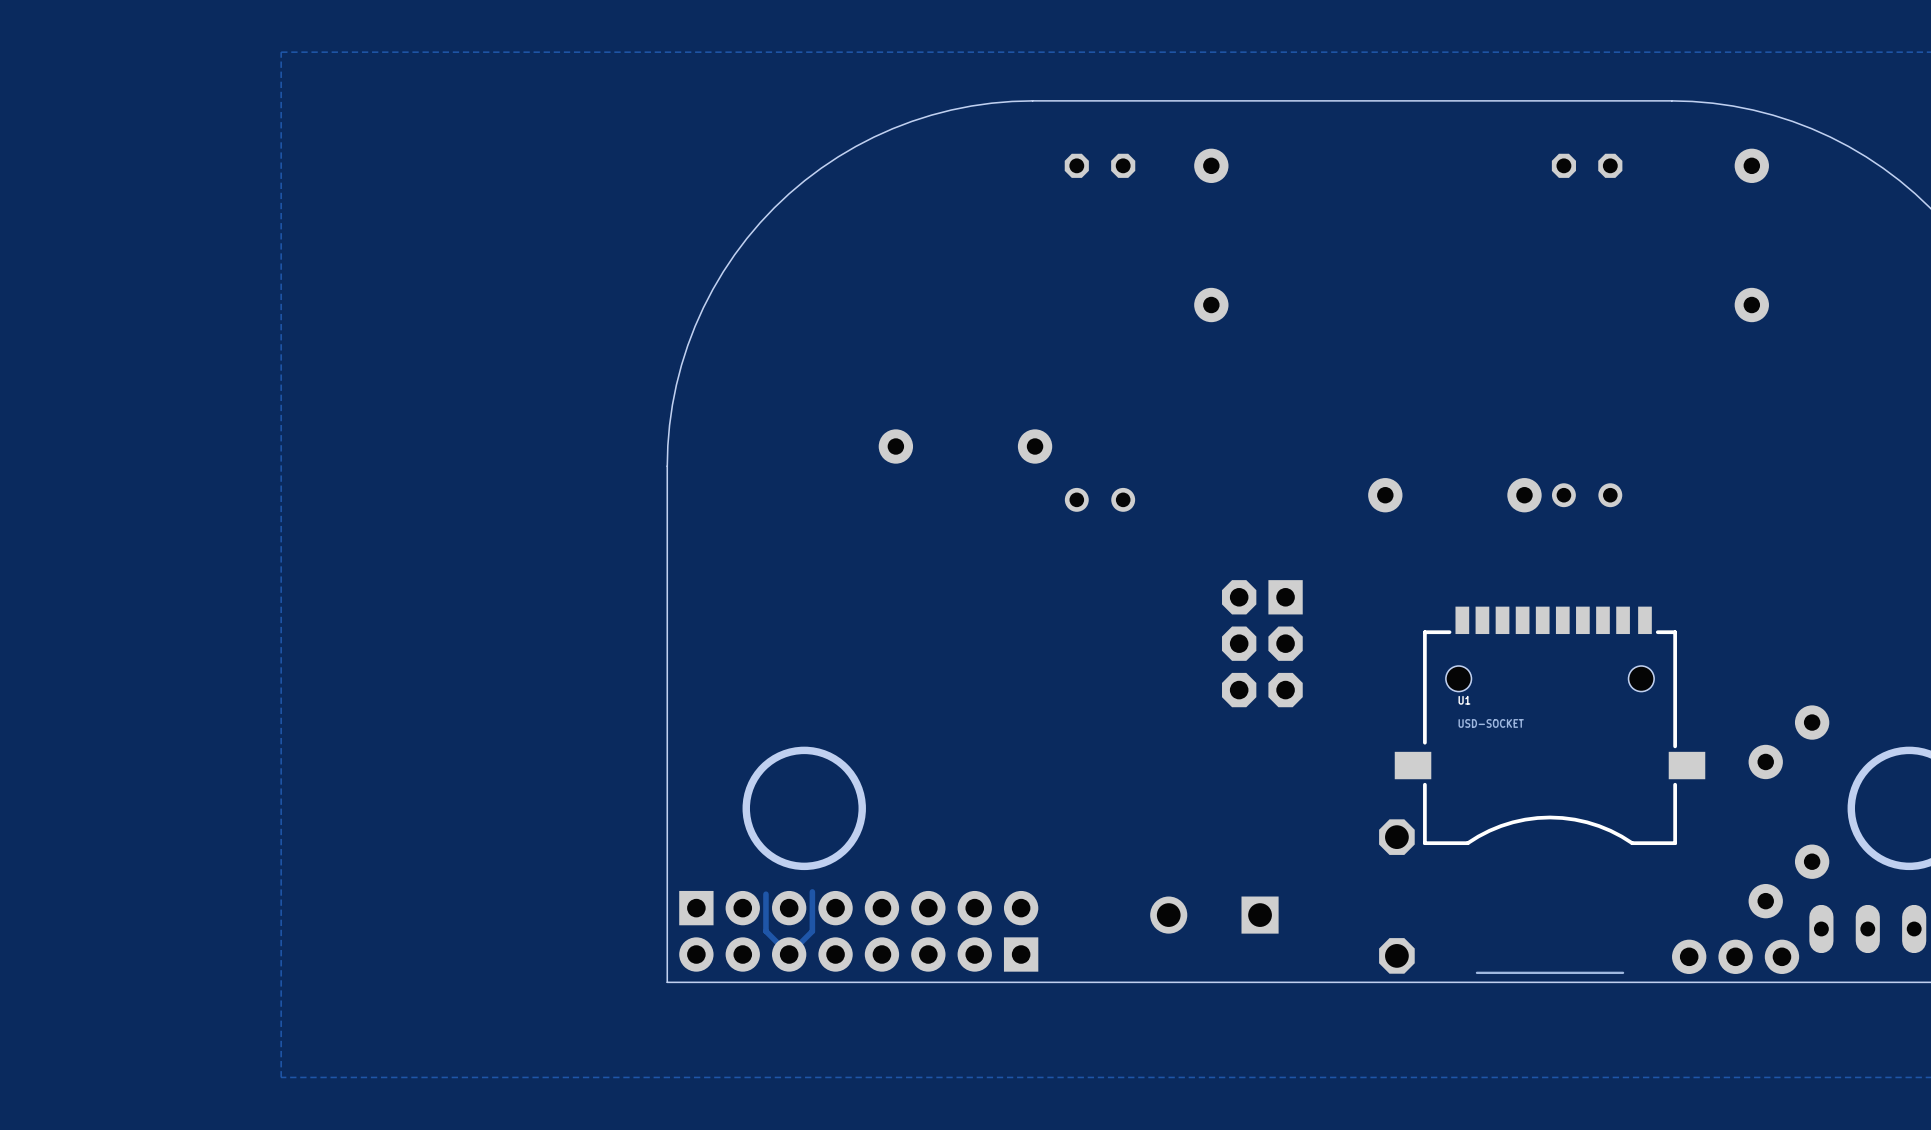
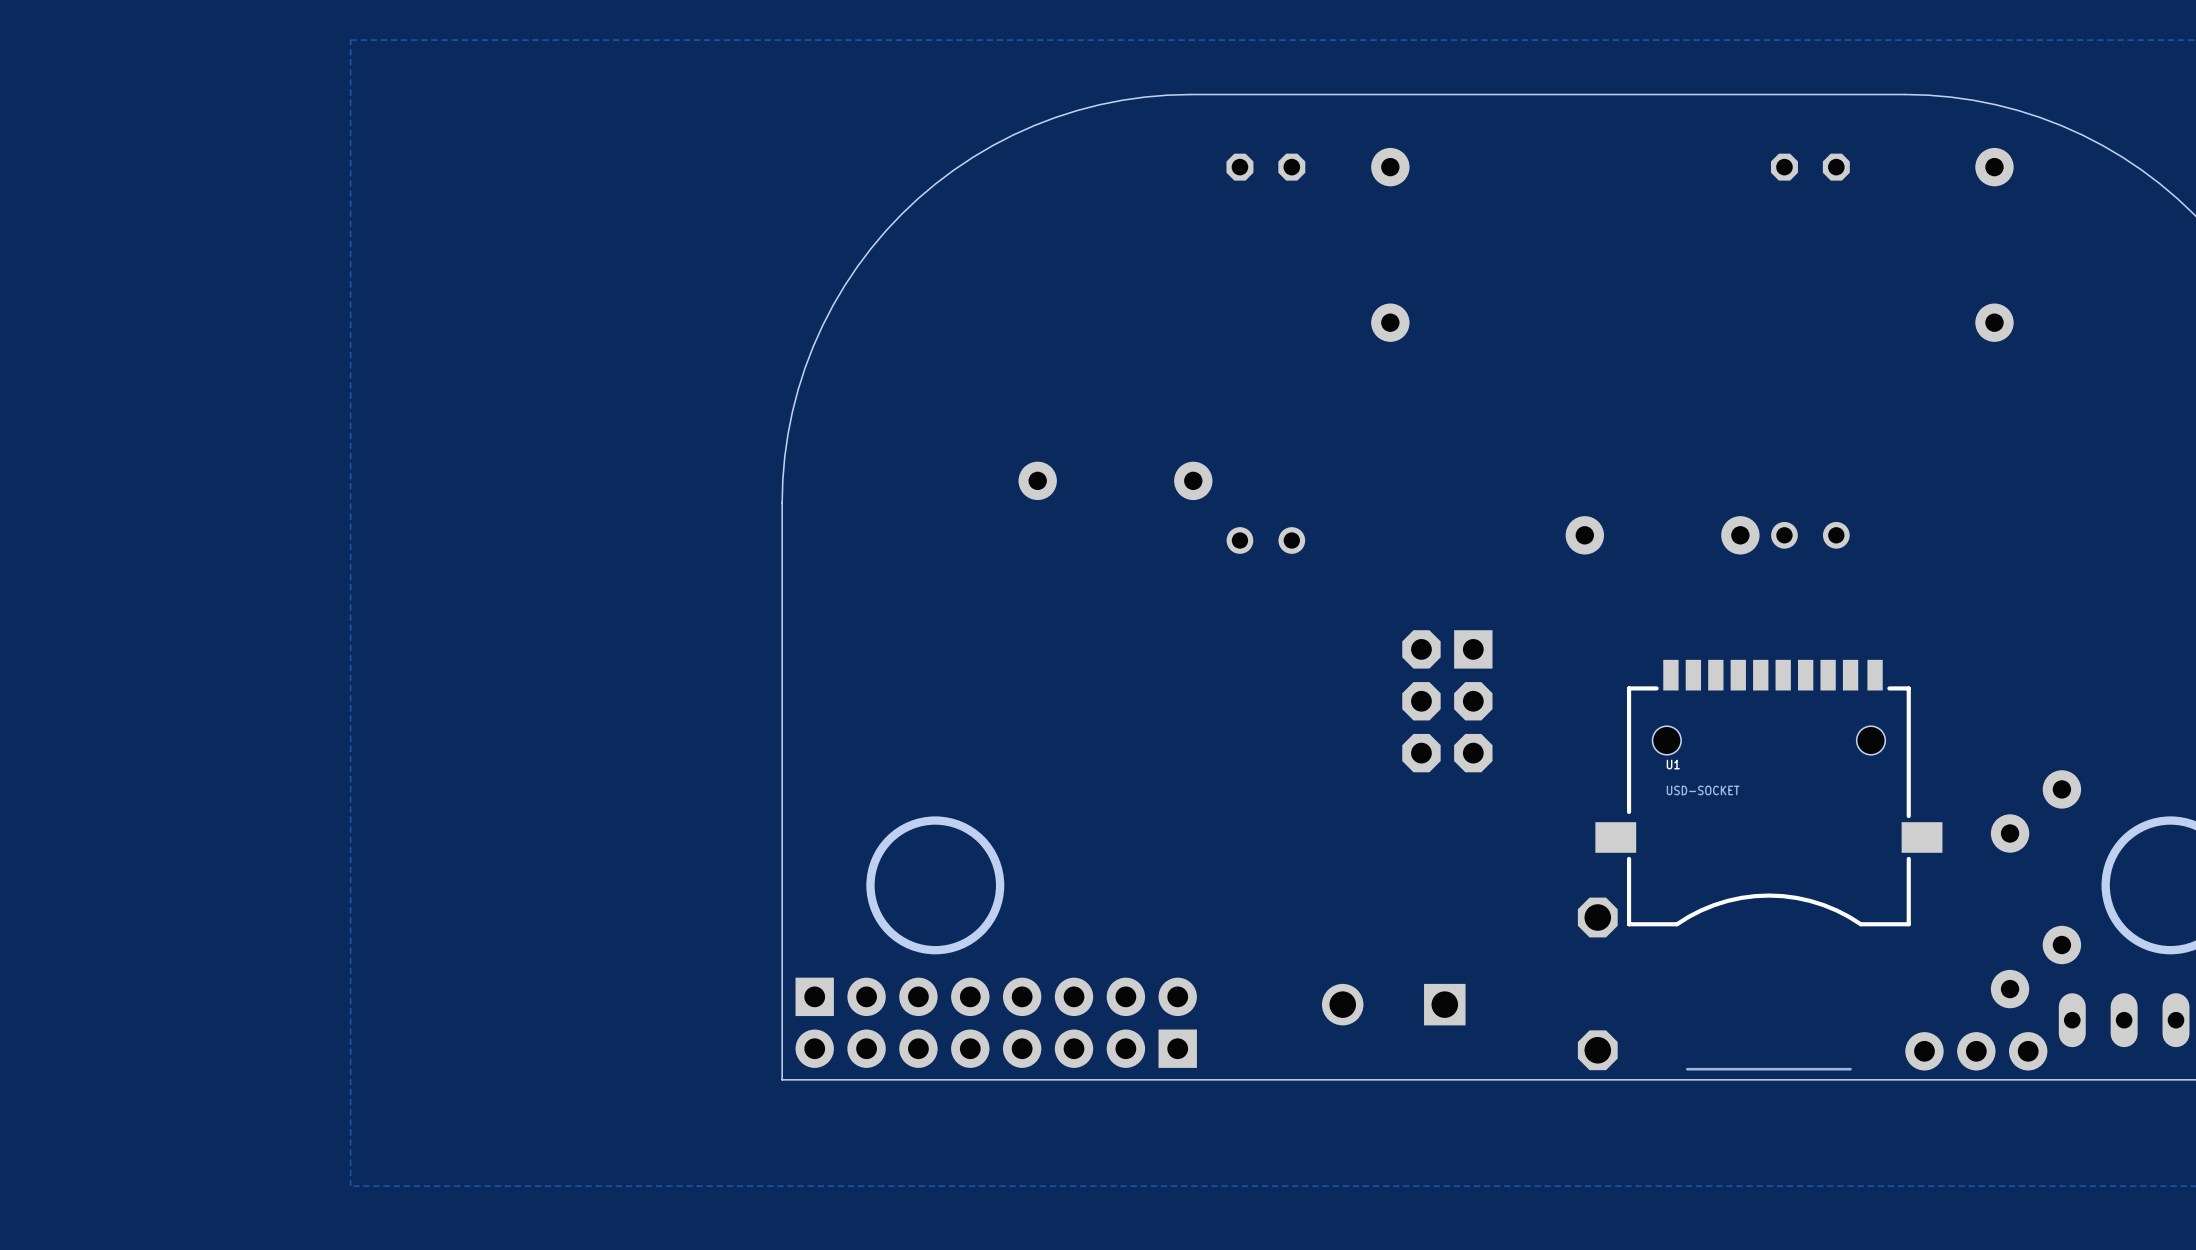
track: (812, 891) (812, 931) (789, 954) (765, 931) (765, 894) -> none

